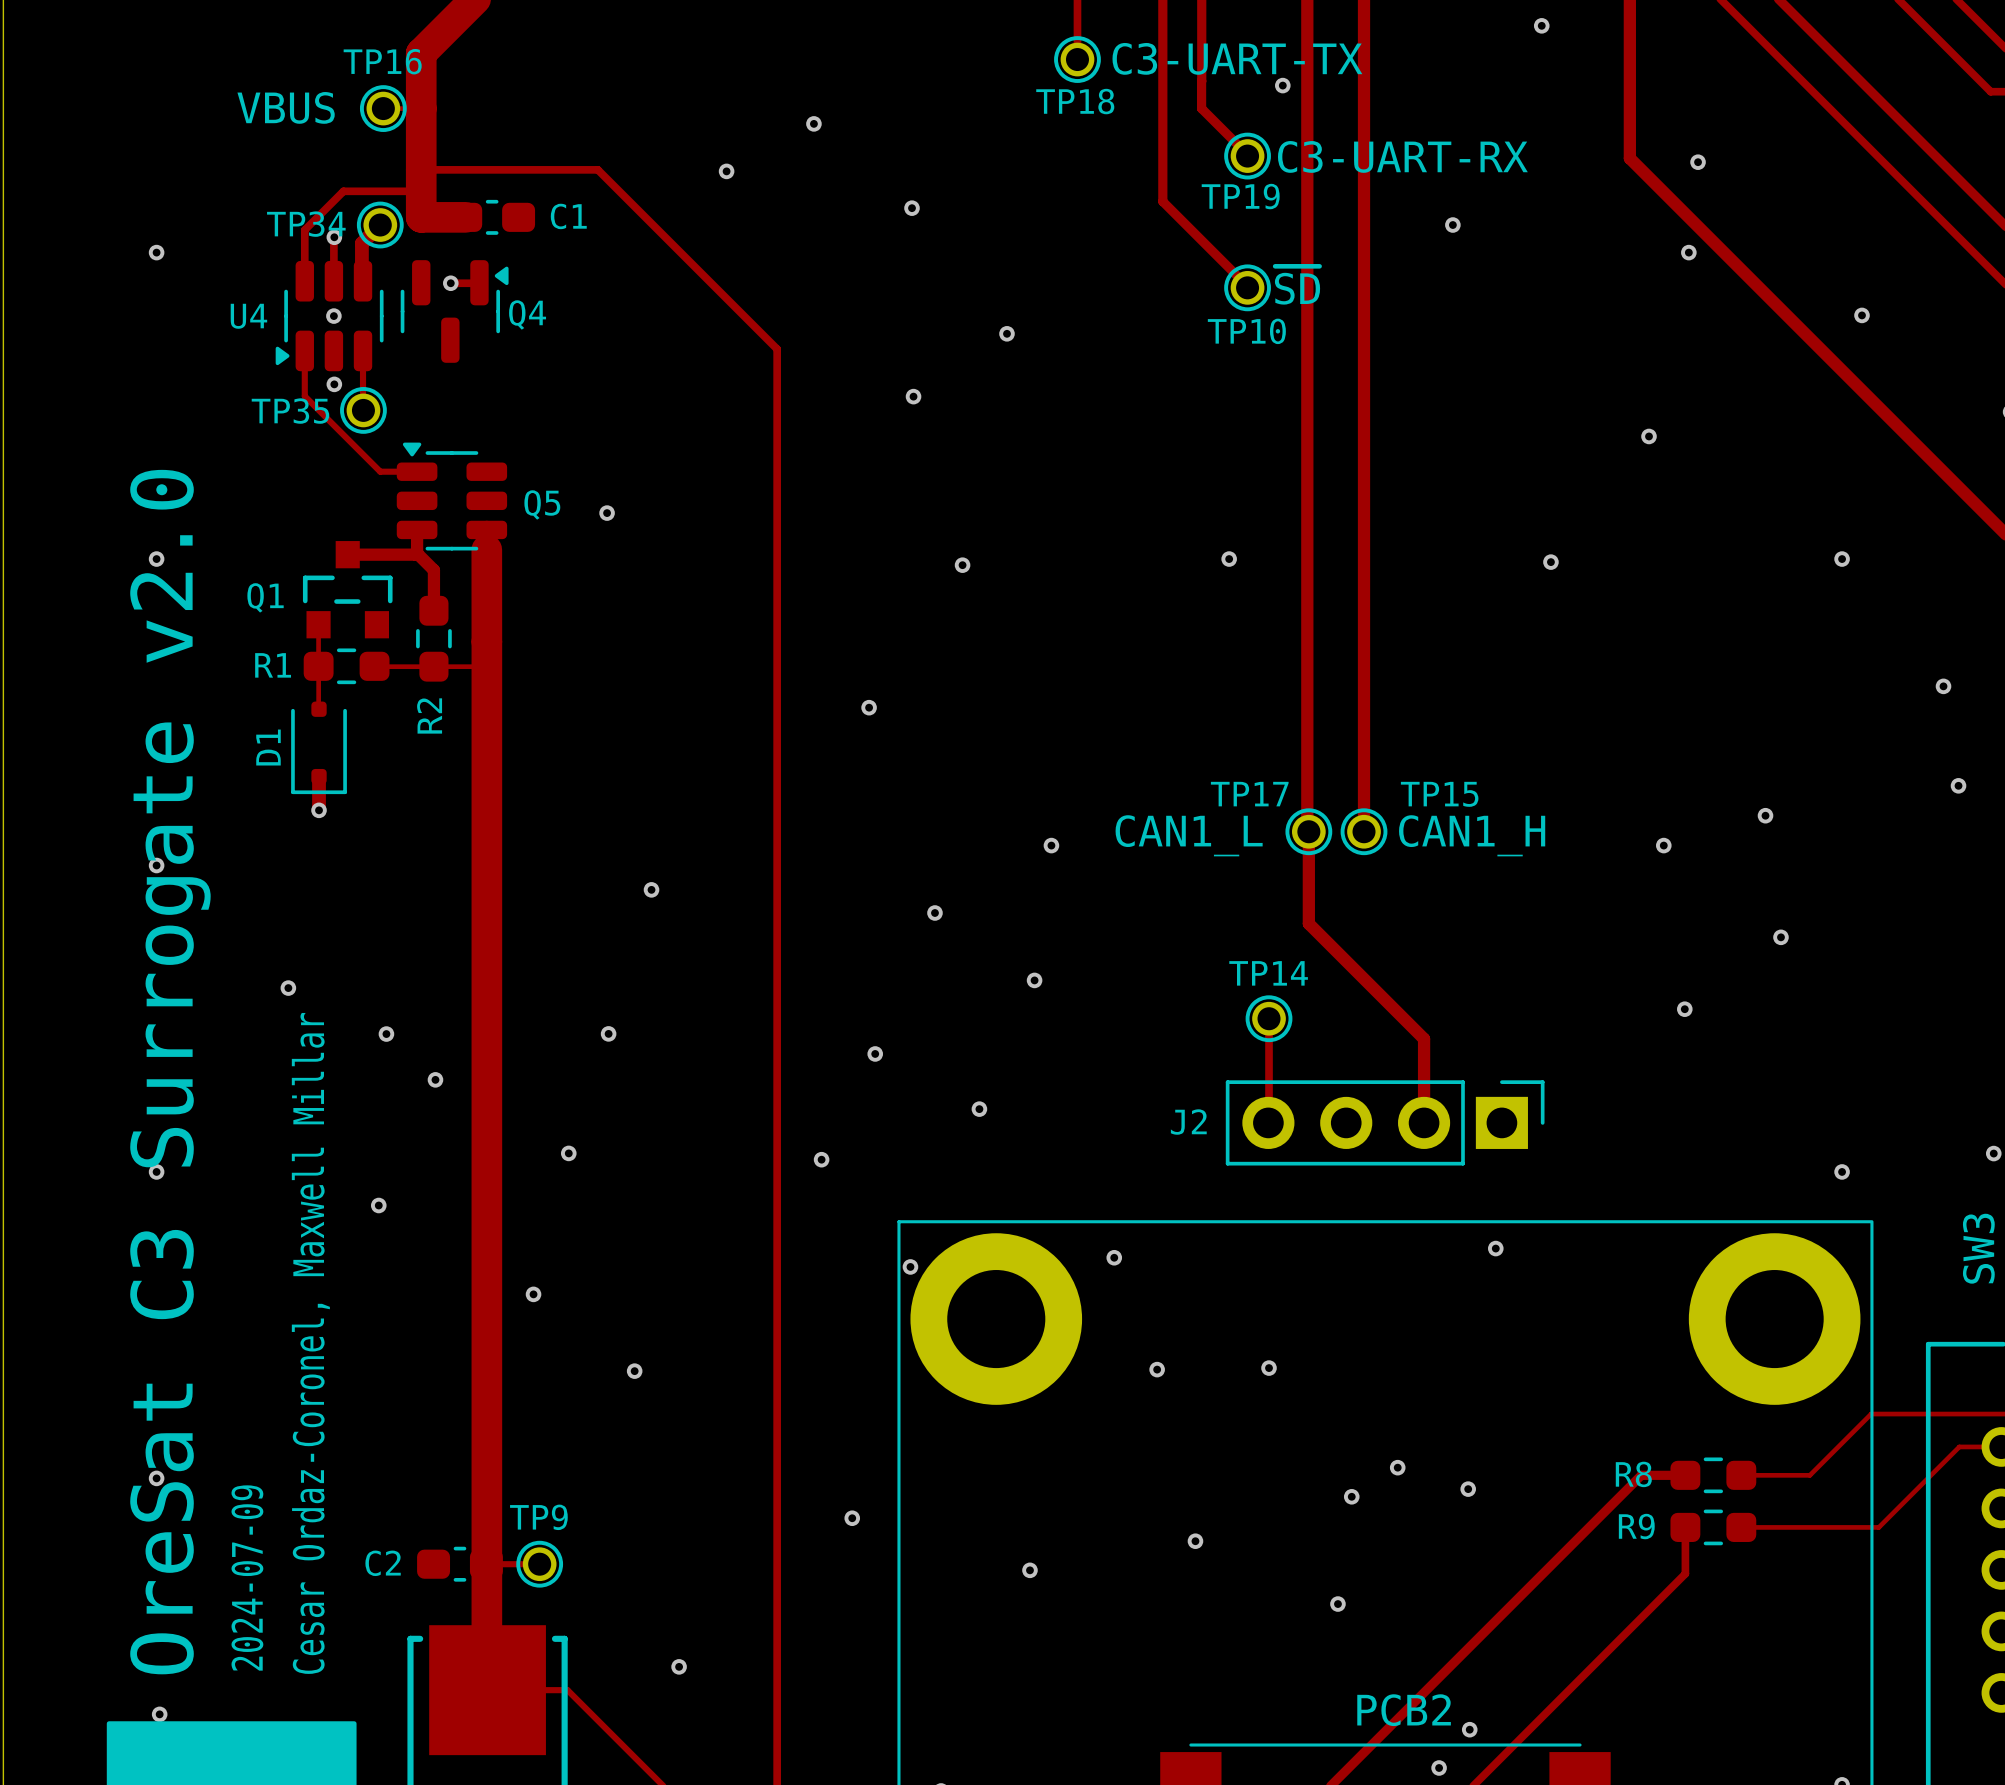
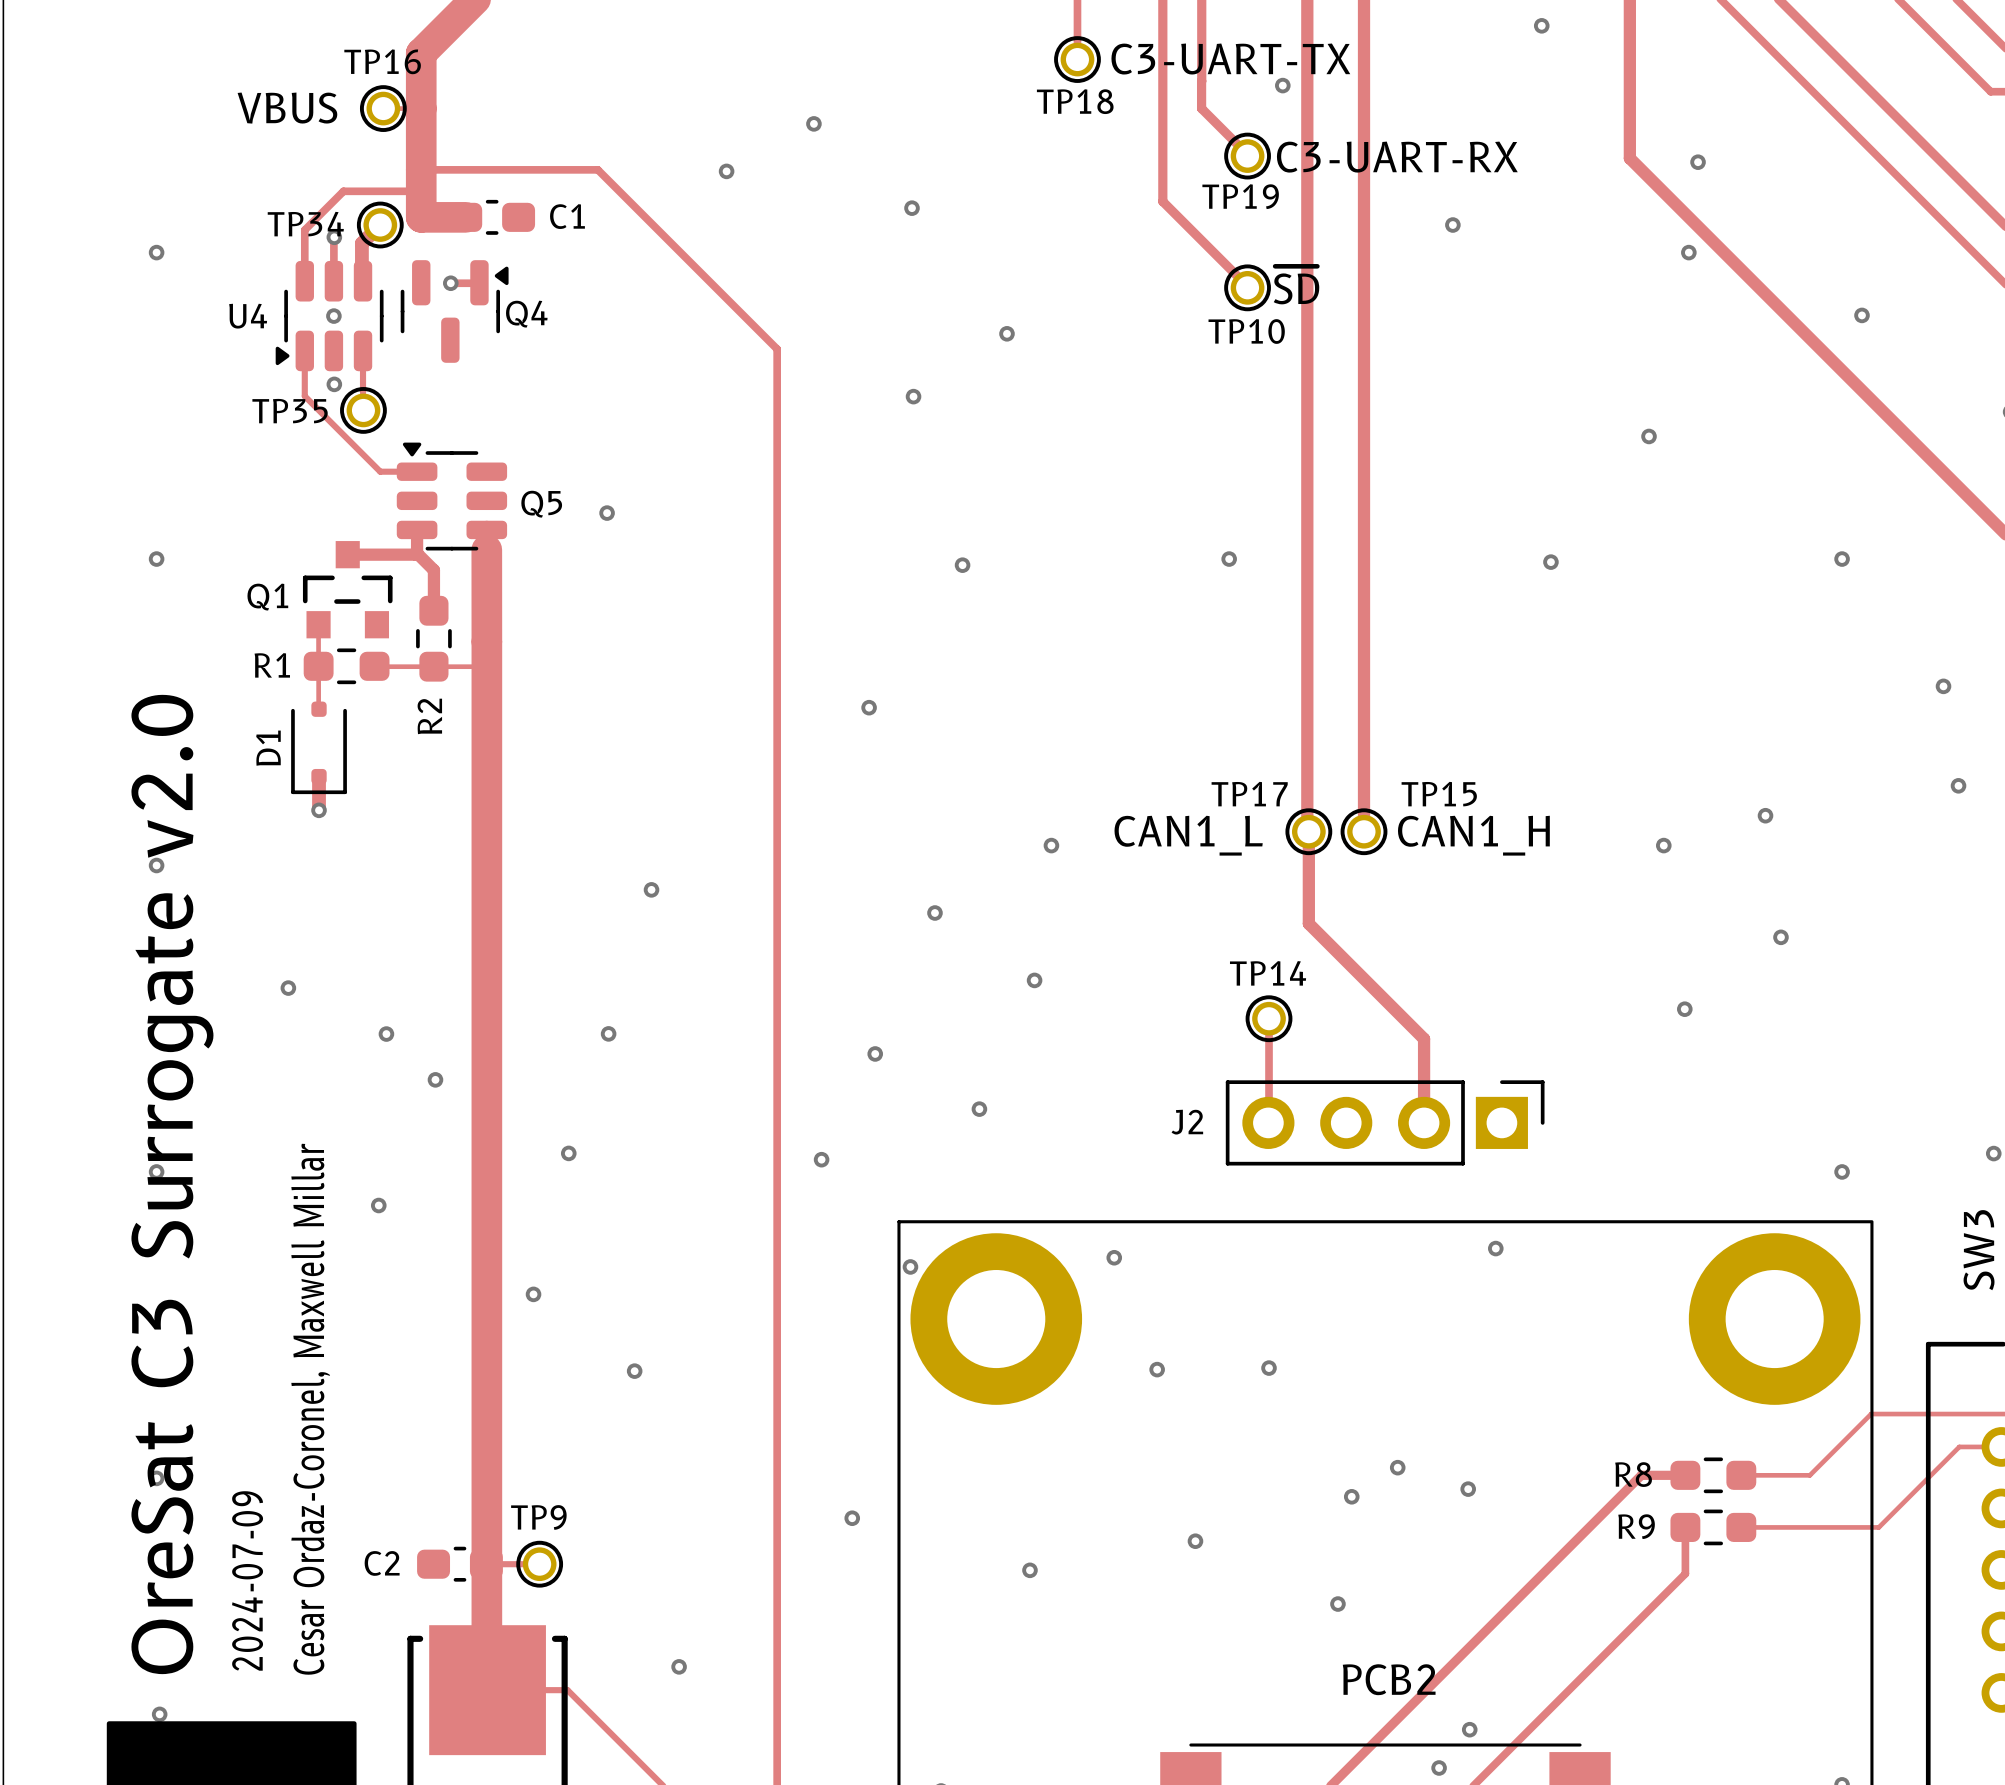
PCB2 name position: PCB2 (1404, 1710) -> PCB2 (1389, 1679)

